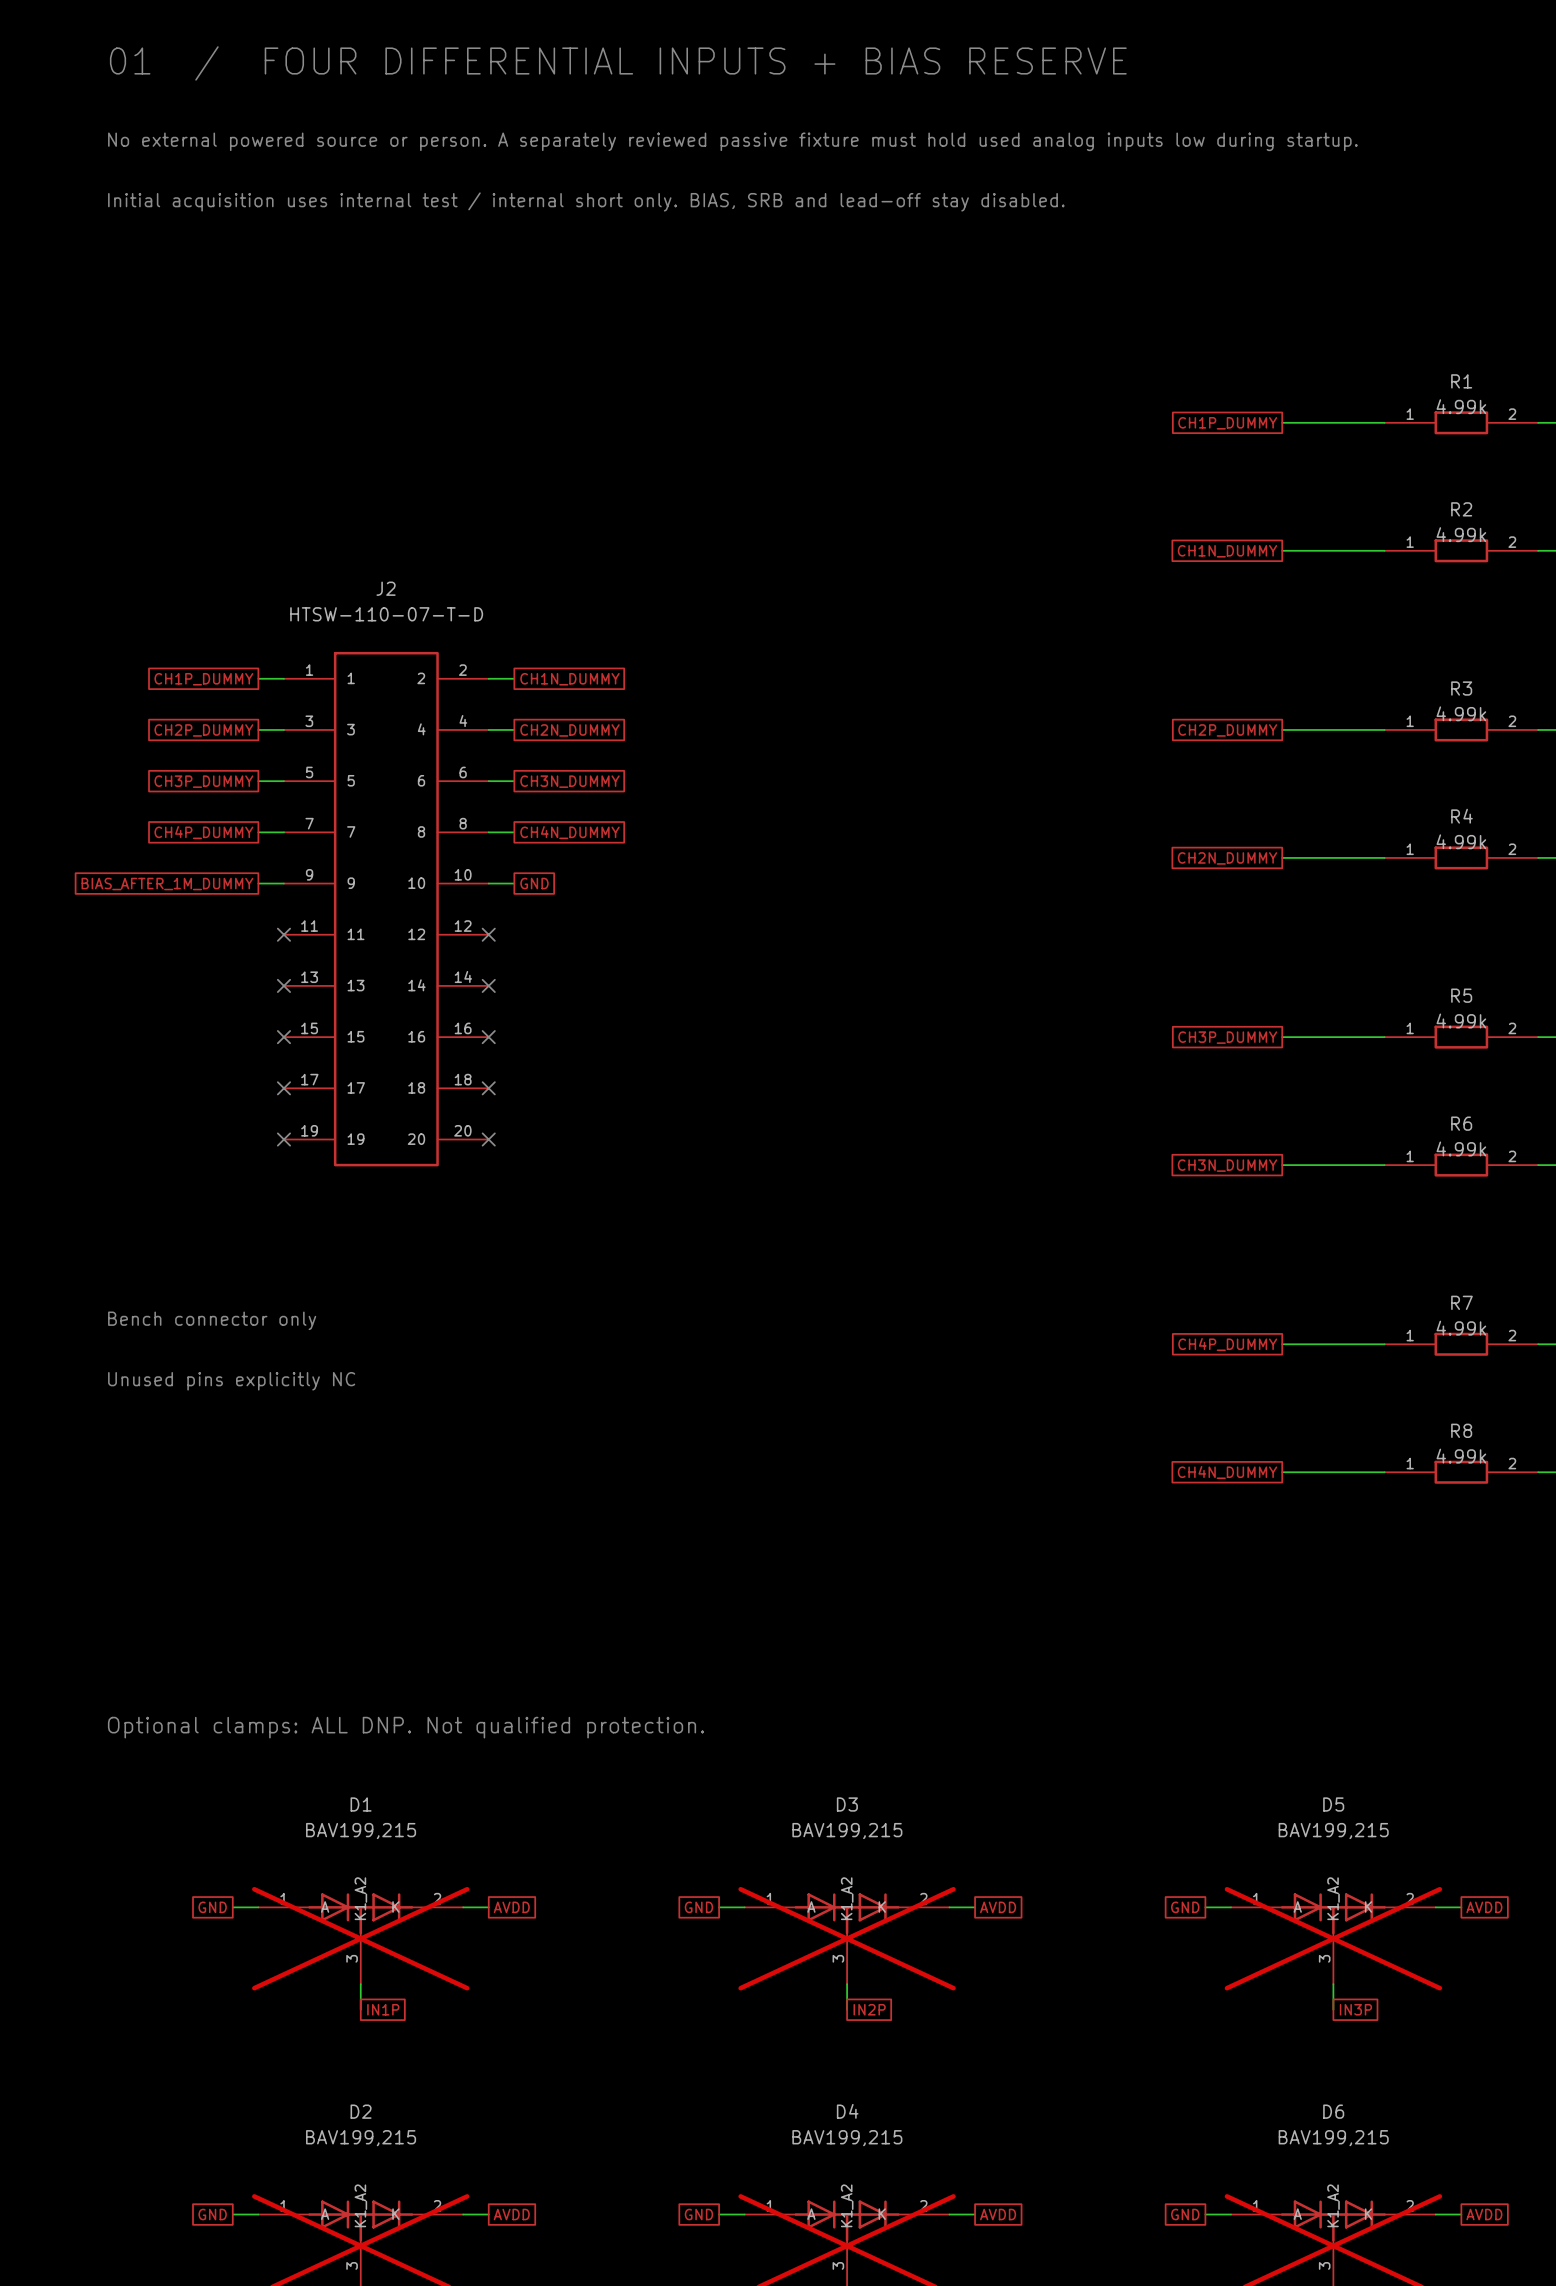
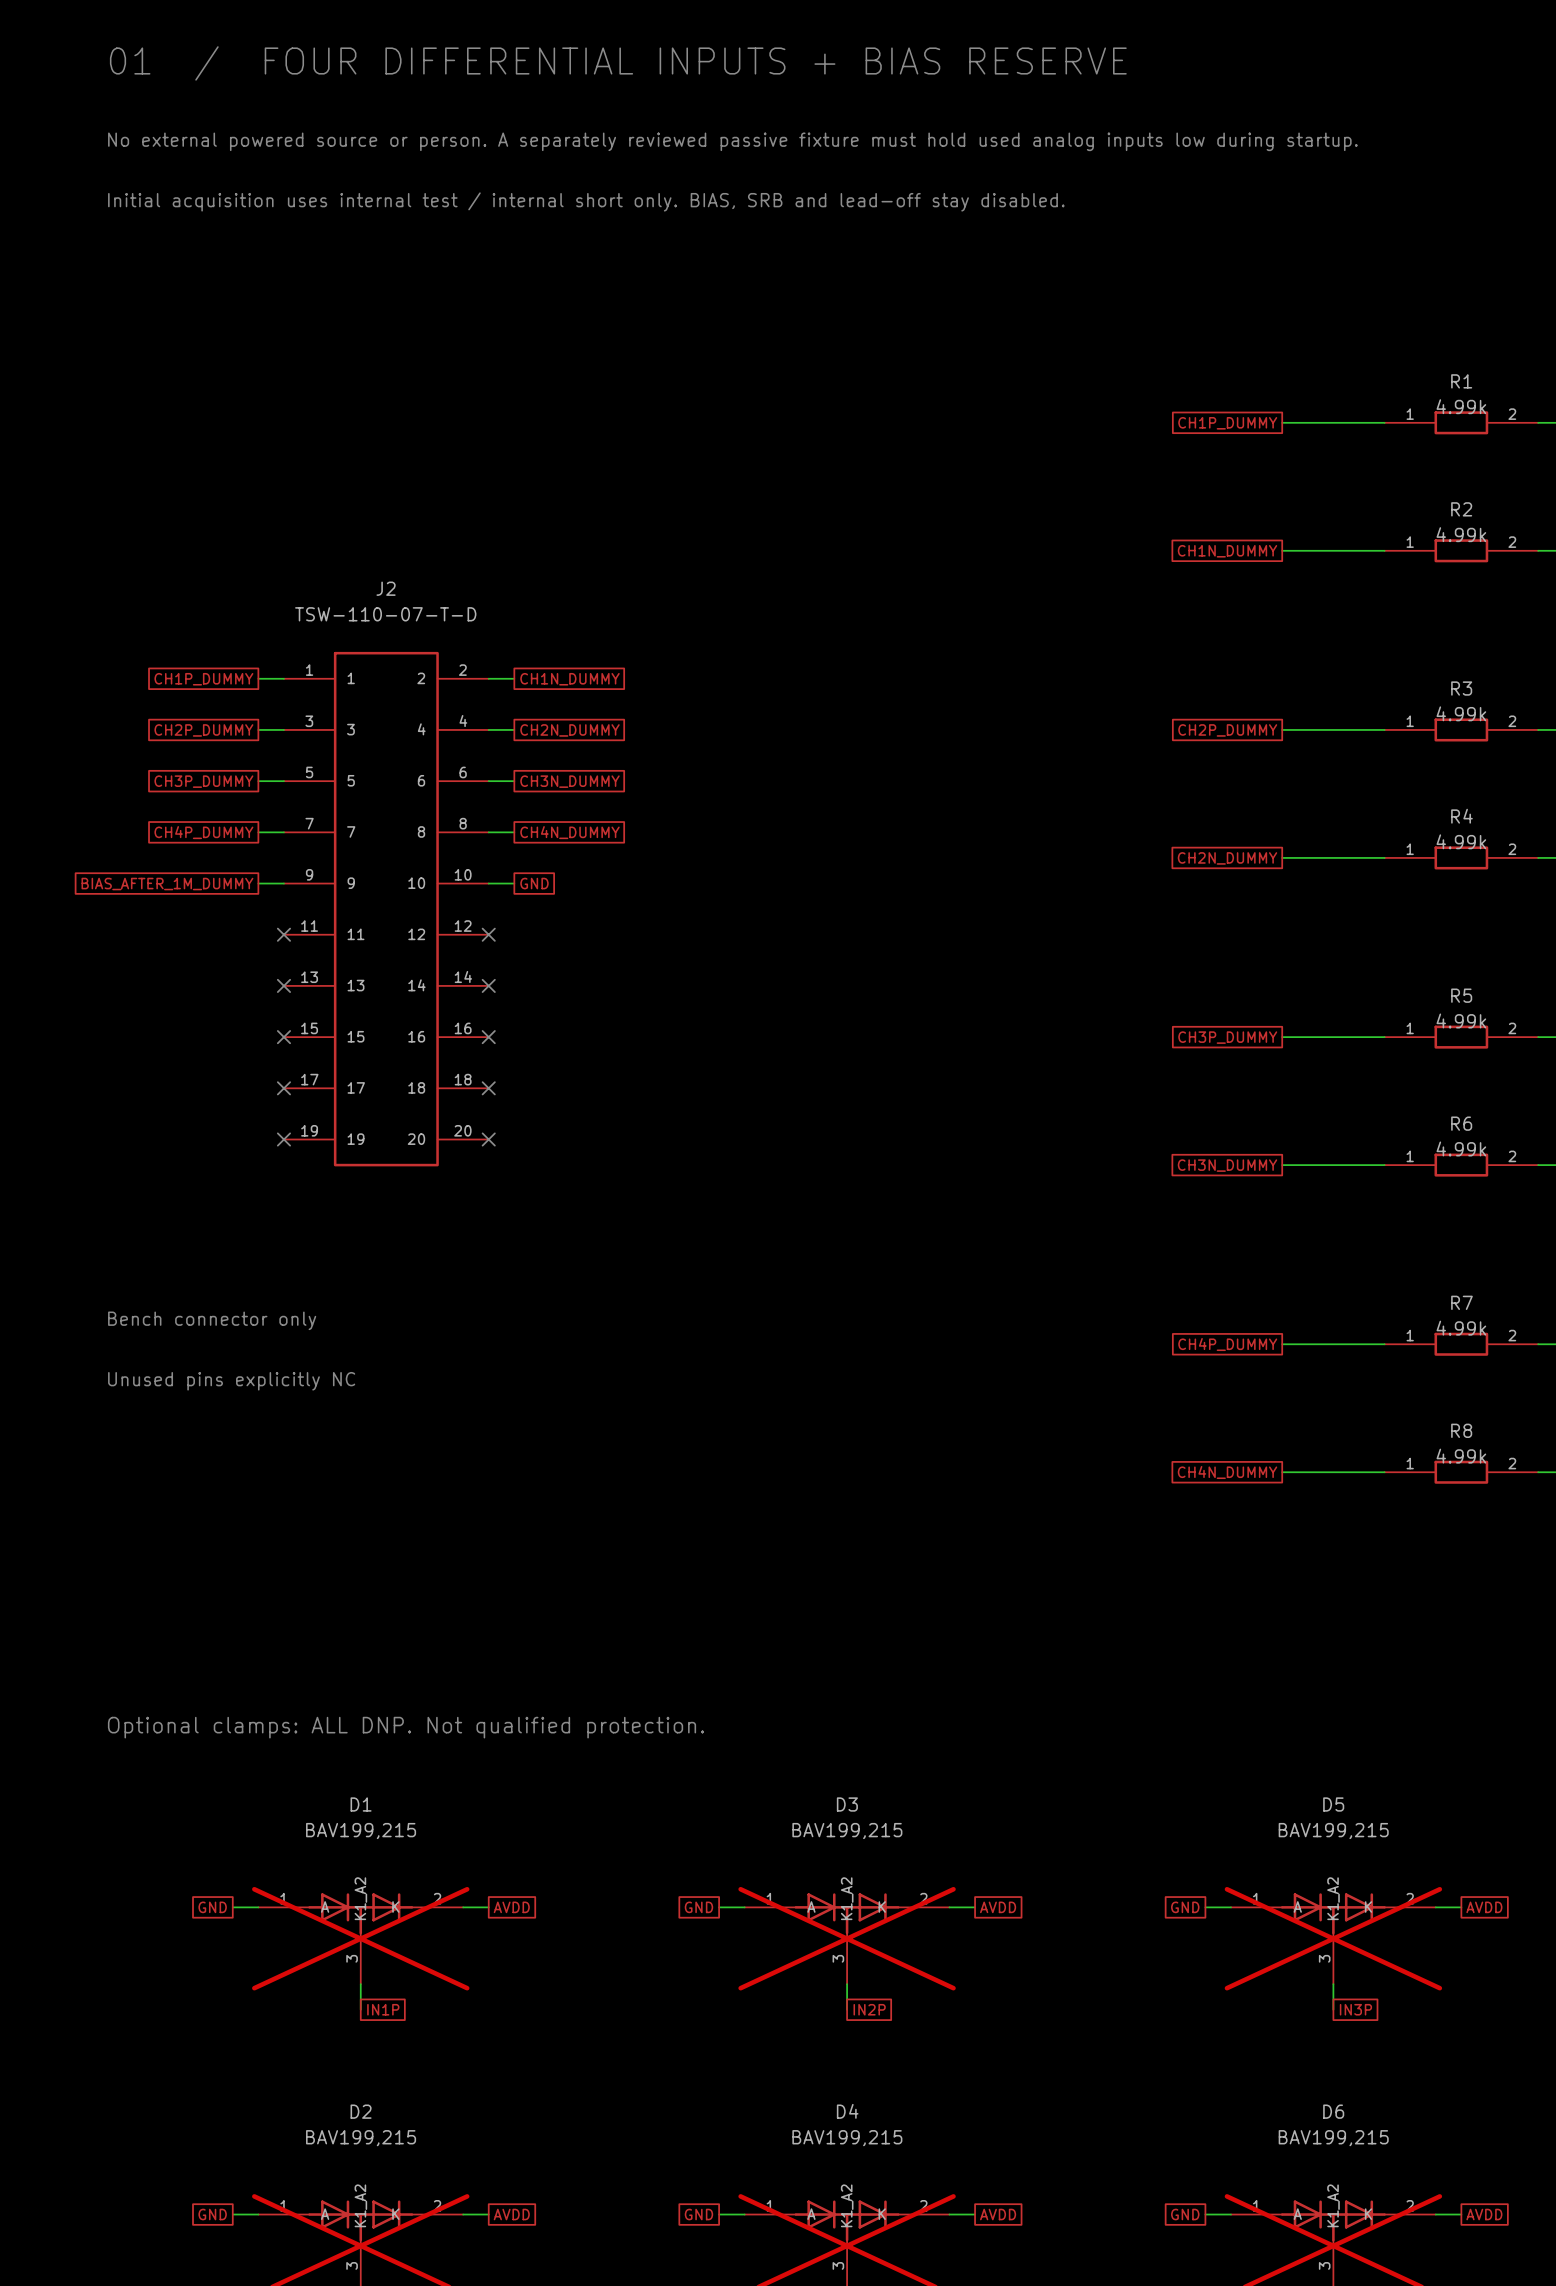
J2 value: HTSW-110-07-T-D (386, 614) -> TSW-110-07-T-D (385, 614)

